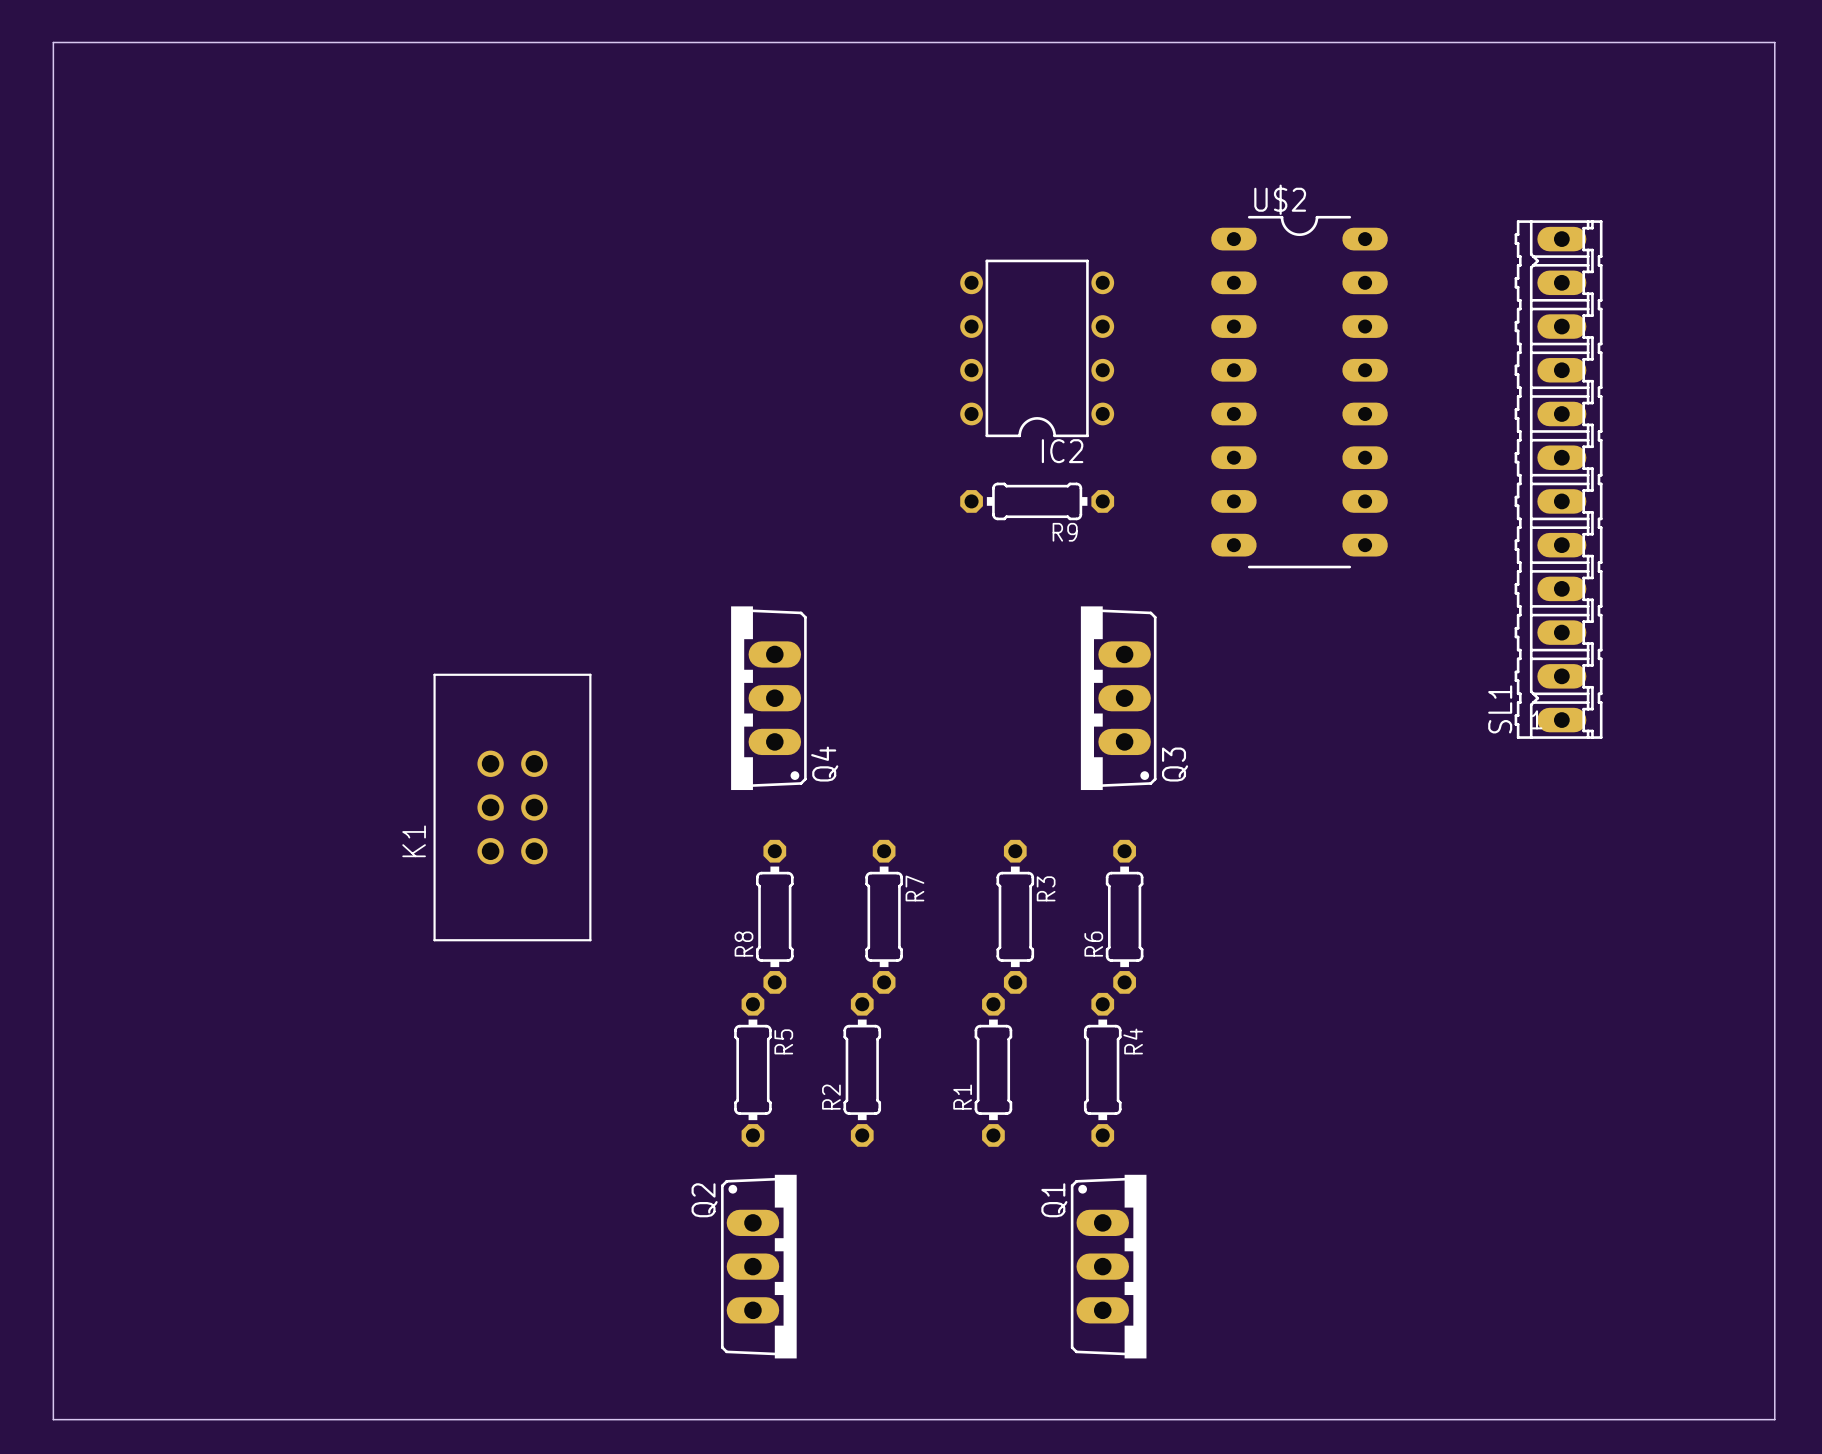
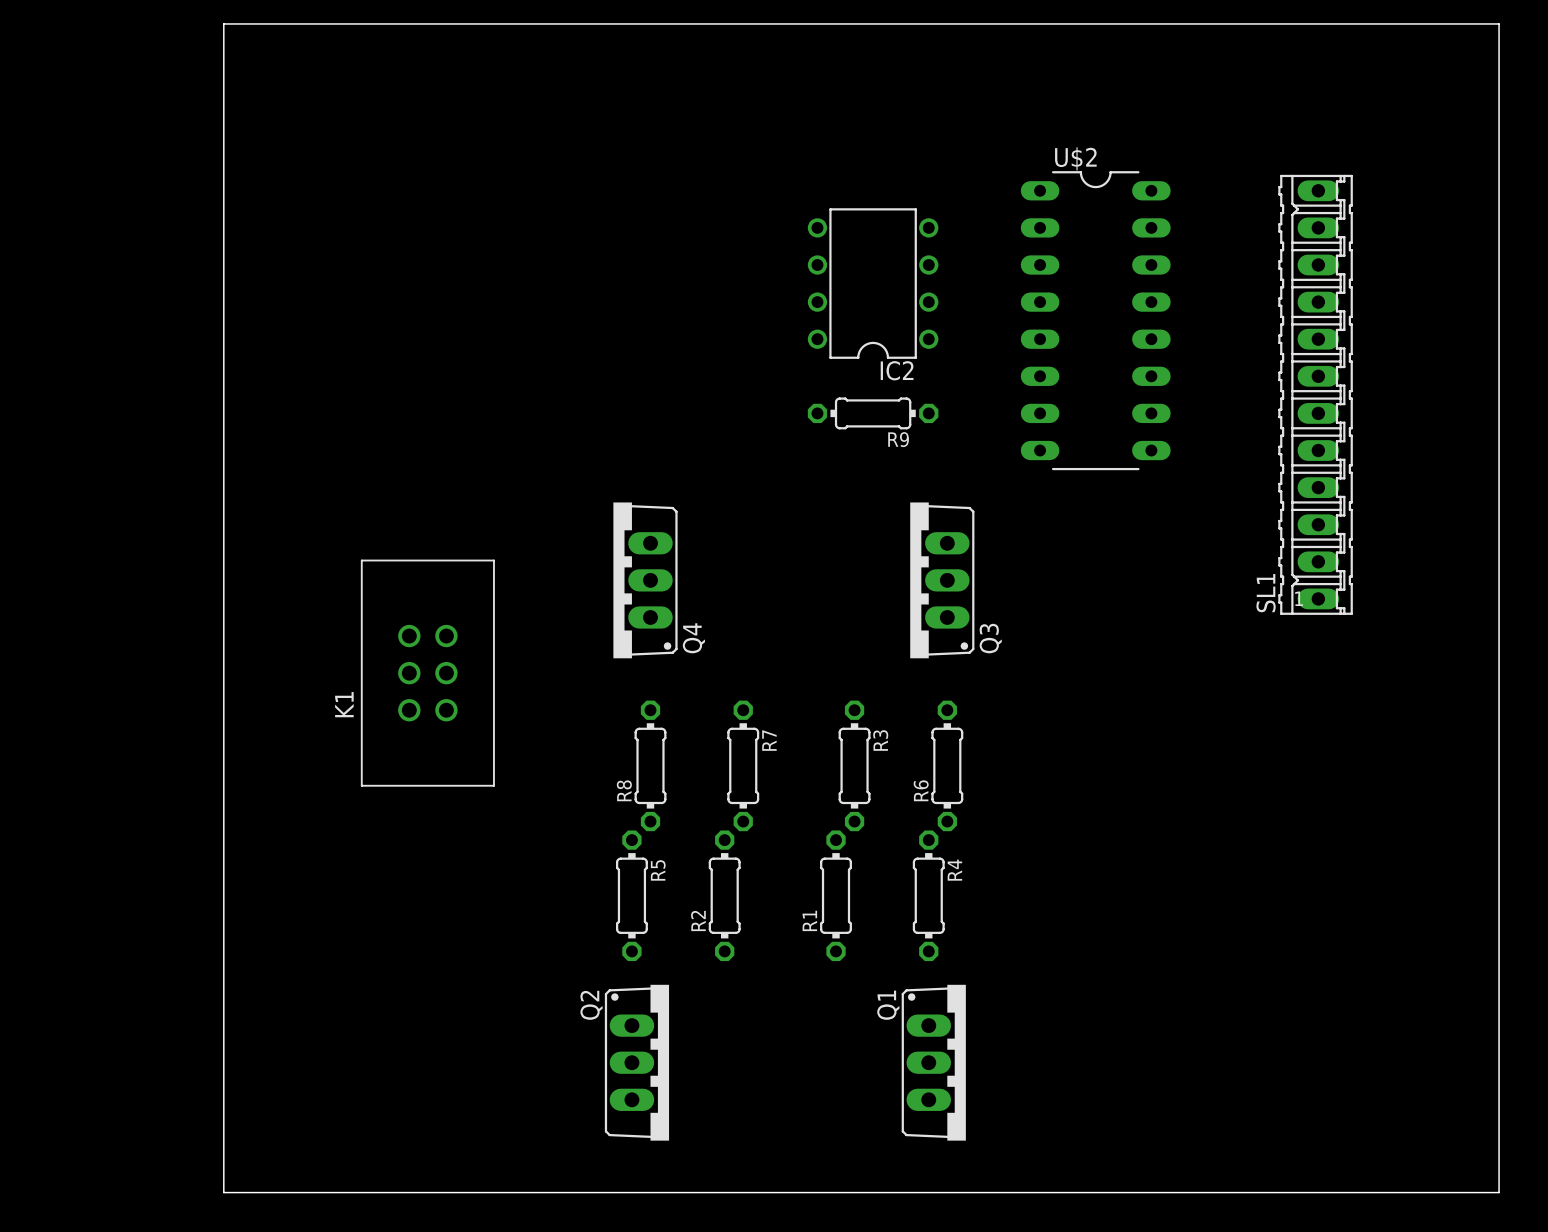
board edge: (271, 42) (53, 42) (53, 1419) (271, 1419) -> (223, 23) (223, 1192)

